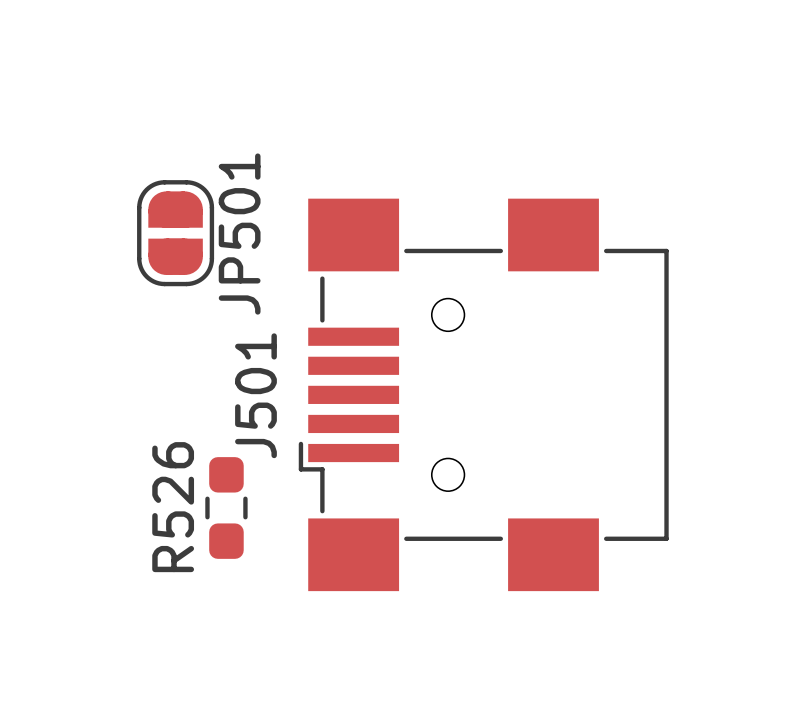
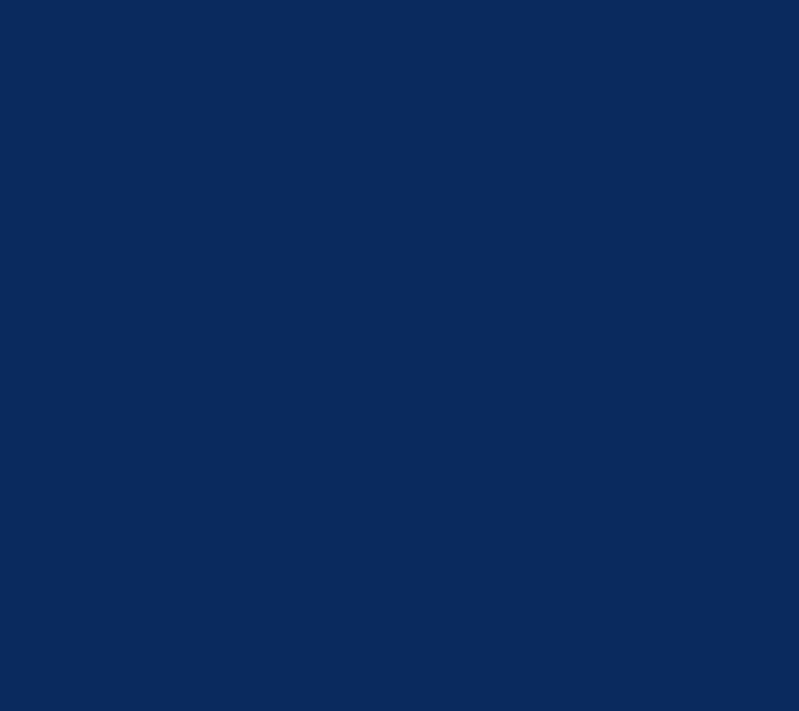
JP501: (175, 233) -> none
J501: (483, 394) -> none
R526: (226, 507) -> none

